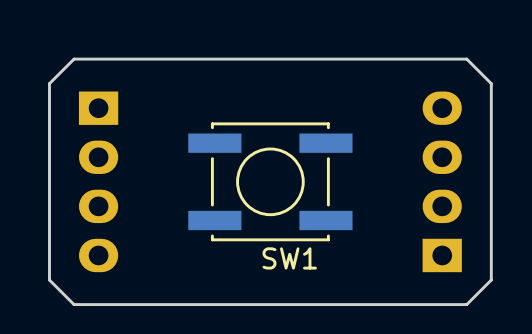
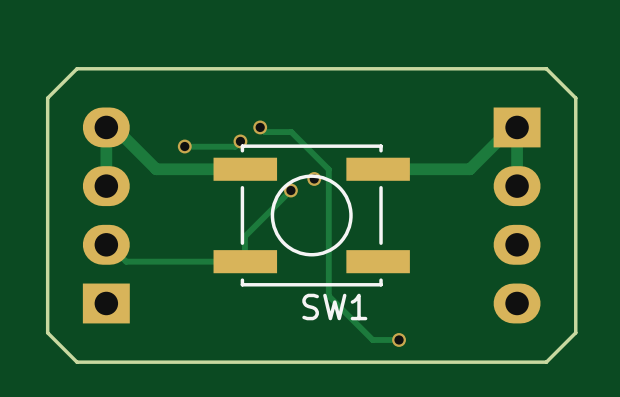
track: none -> (260, 127) (264, 132) (291, 132) (328, 169) (328, 296) (372, 339) (398, 339)
via: none -> (260, 127)
track: none -> (240, 141) (235, 146) (185, 146)
via: none -> (240, 141)
via: none -> (184, 146)
track: none -> (253, 169) (251, 171) (245, 169) (156, 169) (115, 128) (106, 127) (105, 189) (106, 186)
track: none -> (378, 169) (469, 169) (509, 129) (517, 127) (517, 187) (515, 189) (517, 186)
via: none -> (314, 178)
track: none -> (290, 190) (244, 236) (245, 261) (126, 261) (109, 245) (106, 244)
via: none -> (290, 190)
part rotation: 0° (98, 181) -> 180° (106, 215)
part rotation: 0° (442, 181) -> 180° (517, 215)
via: none -> (399, 339)

